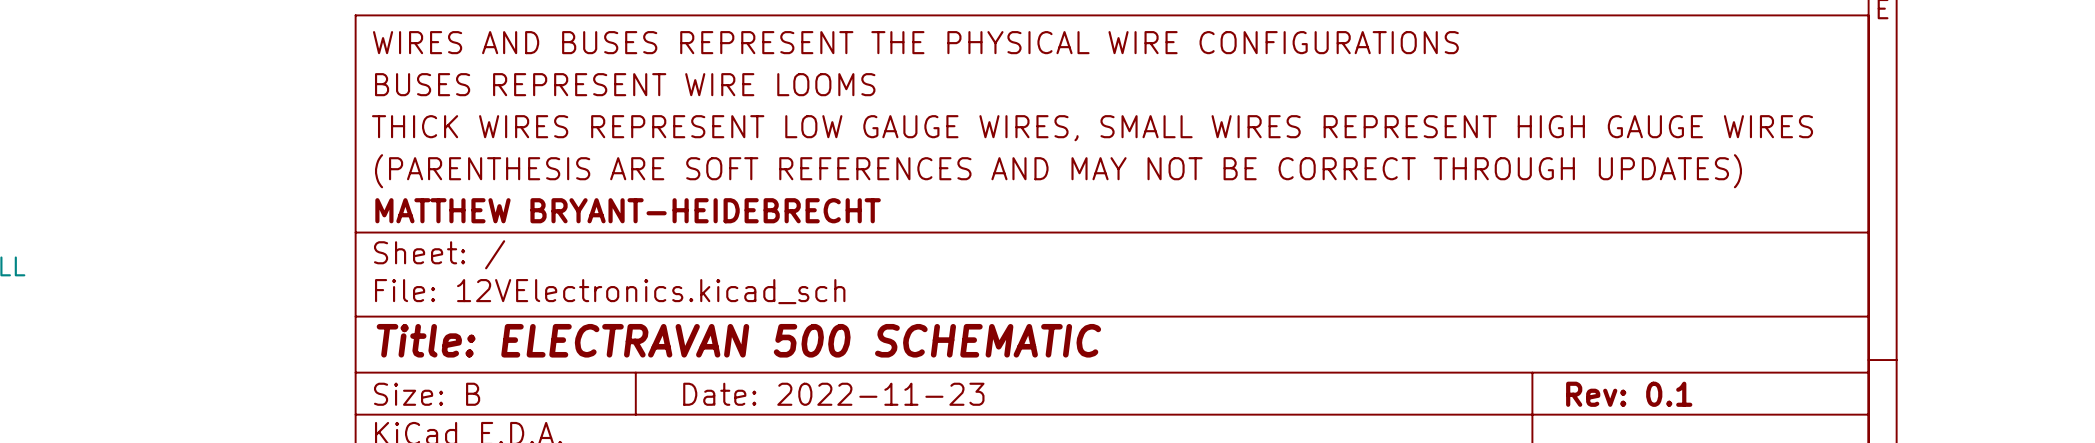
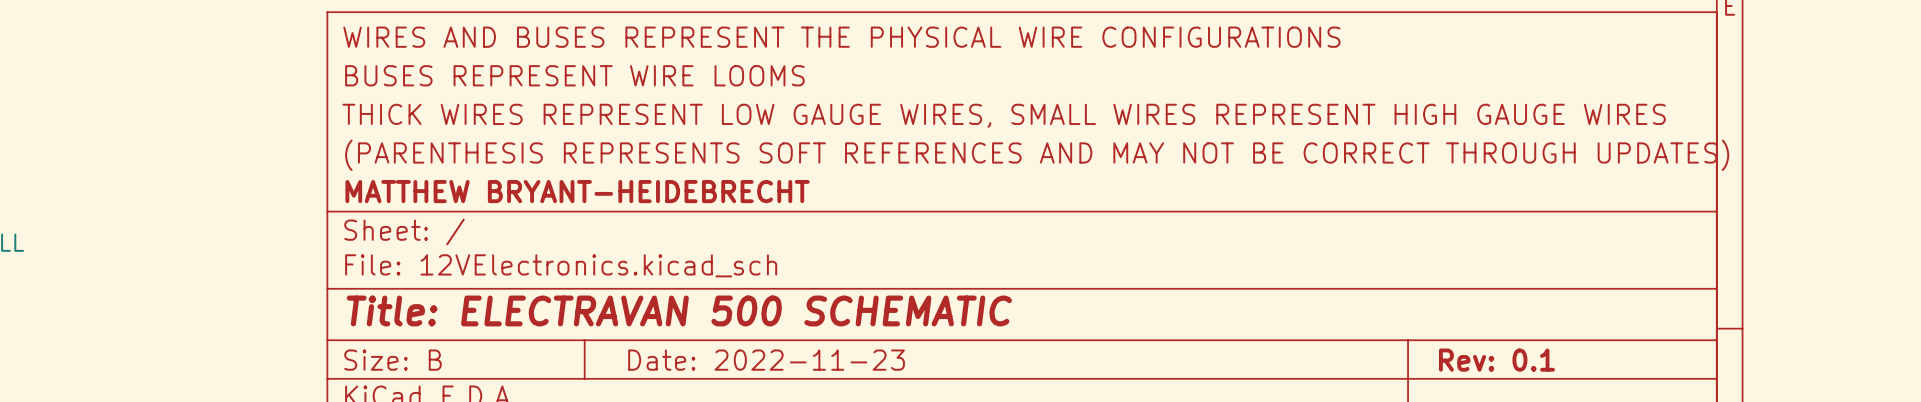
title block: (PARENTHESIS ARE SOFT REFERENCES AND MAY NOT BE CORRECT THROUGH UPDATES) (1058, 171) -> (PARENTHESIS REPRESENTS SOFT REFERENCES AND MAY NOT BE CORRECT THROUGH UPDATES) (1037, 155)

